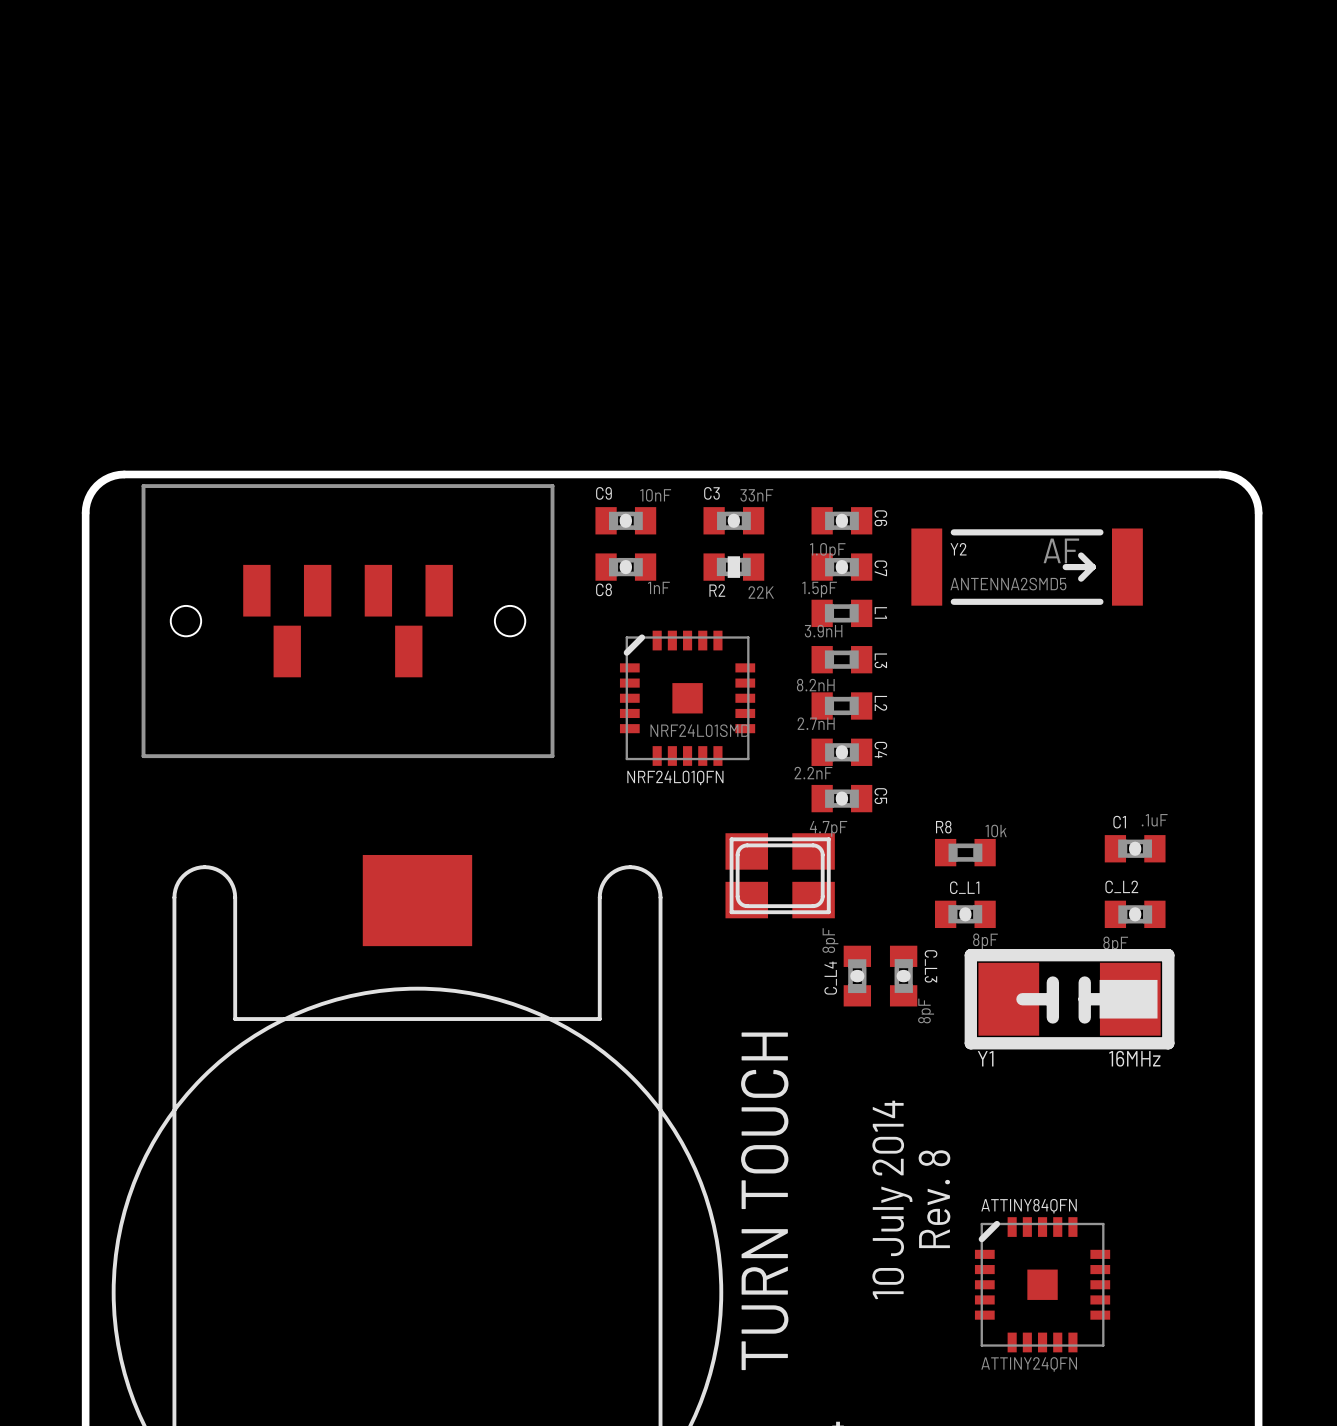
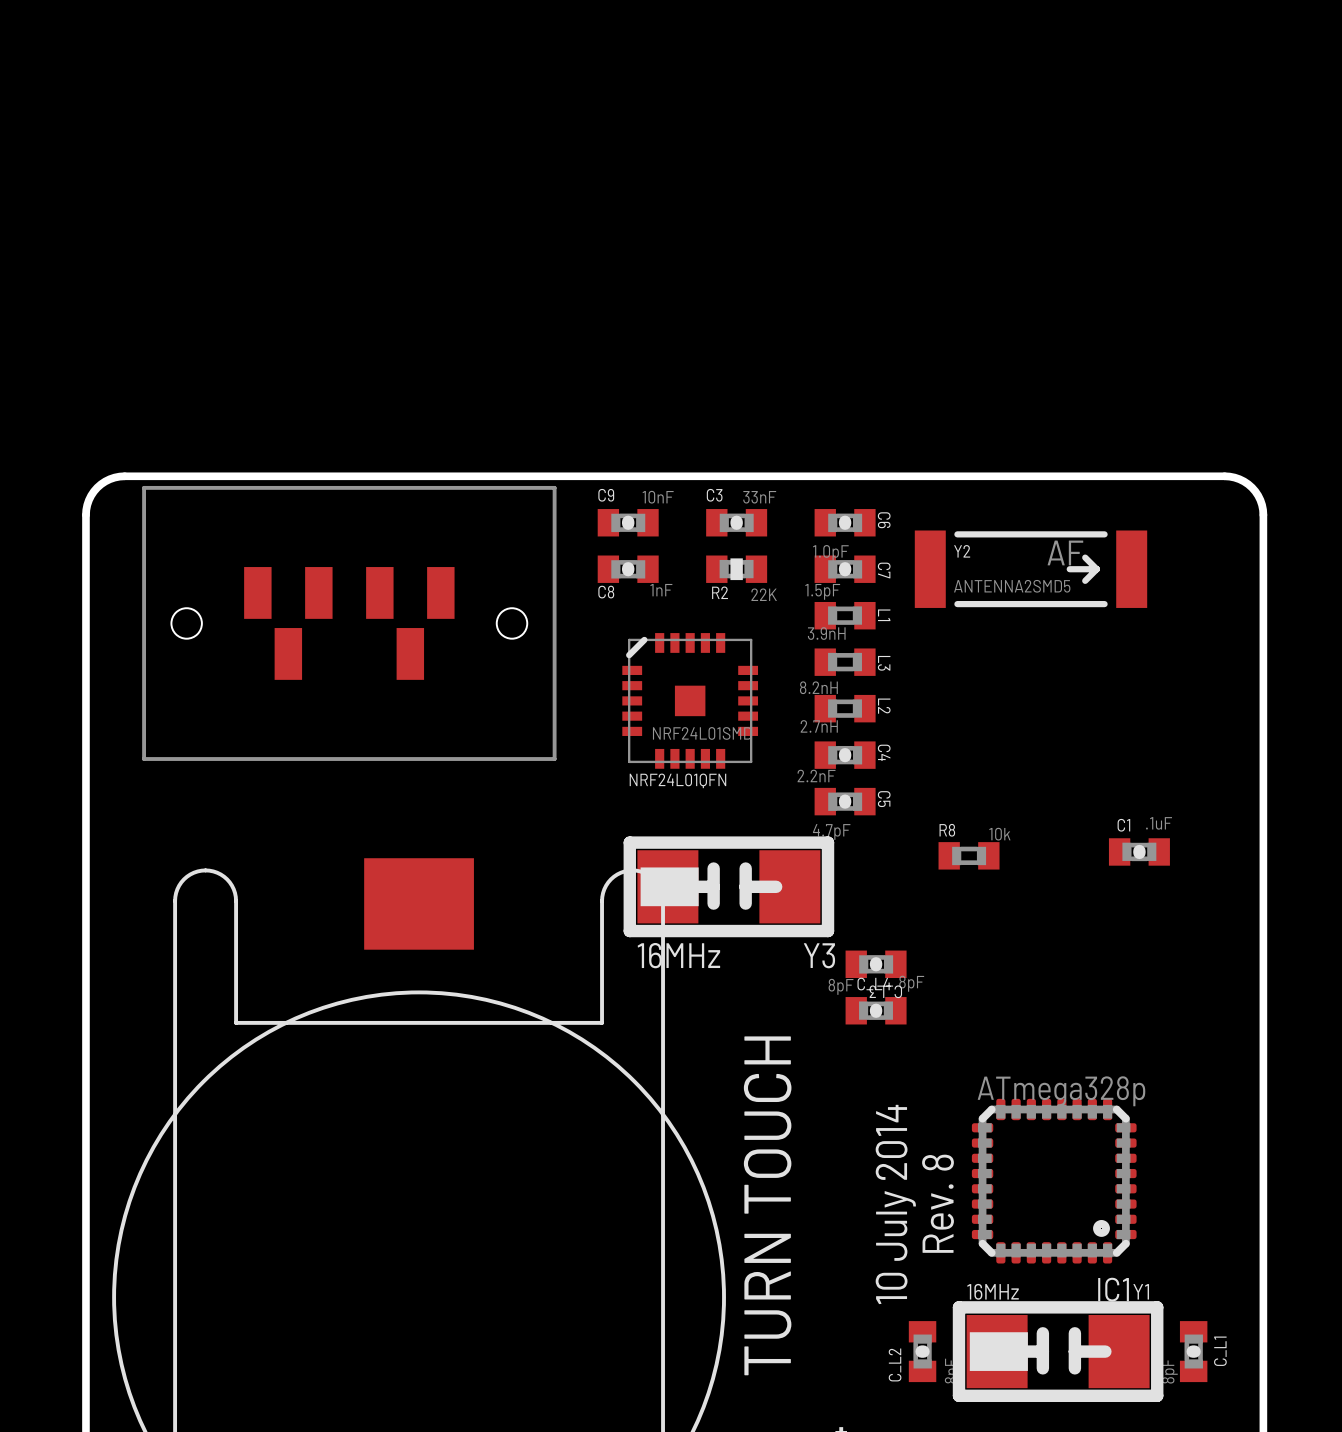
part: (780, 875) -> none
Y3: none -> 16MHz (728, 886)
C_L1 rotation: 0° (965, 914) -> 90° clockwise (1193, 1351)
C_L1 position: (965, 914) -> (1193, 1351)
C_L2 rotation: 0° (1135, 914) -> 90° clockwise (922, 1351)
C_L2 position: (1135, 914) -> (922, 1351)
C_L4 rotation: 0° (857, 976) -> 90° clockwise (876, 1010)
C_L3 rotation: 0° (903, 976) -> 90° clockwise (876, 964)
Y1 rotation: 0° (1069, 999) -> 180° (1058, 1351)
Y1 position: (1069, 999) -> (1058, 1351)
IC1: none -> ATmega328p (1054, 1181)
ATTINY84QFN: ATTINY24QFN (1042, 1284) -> none

